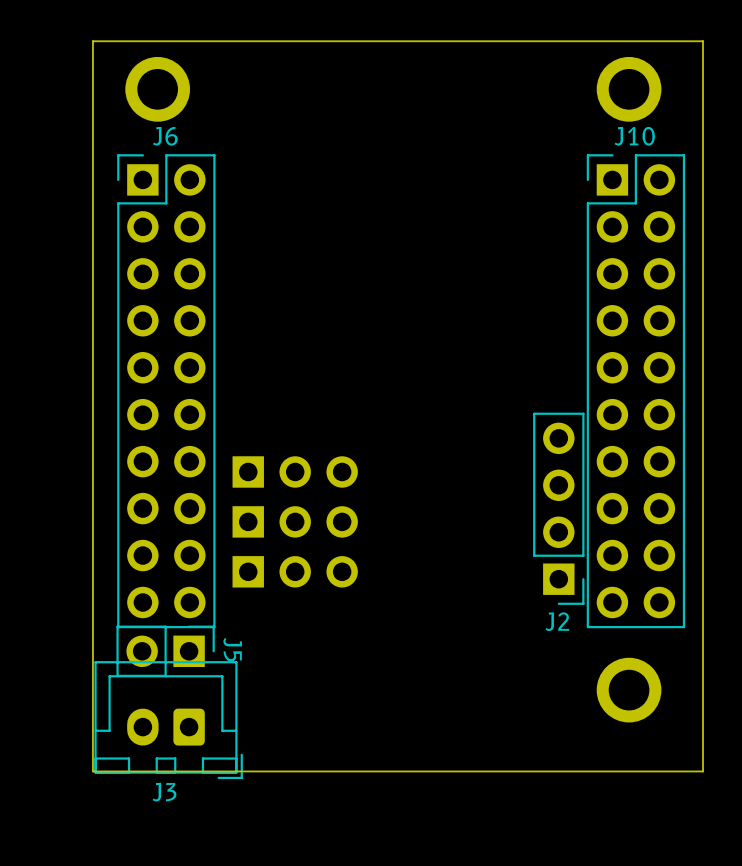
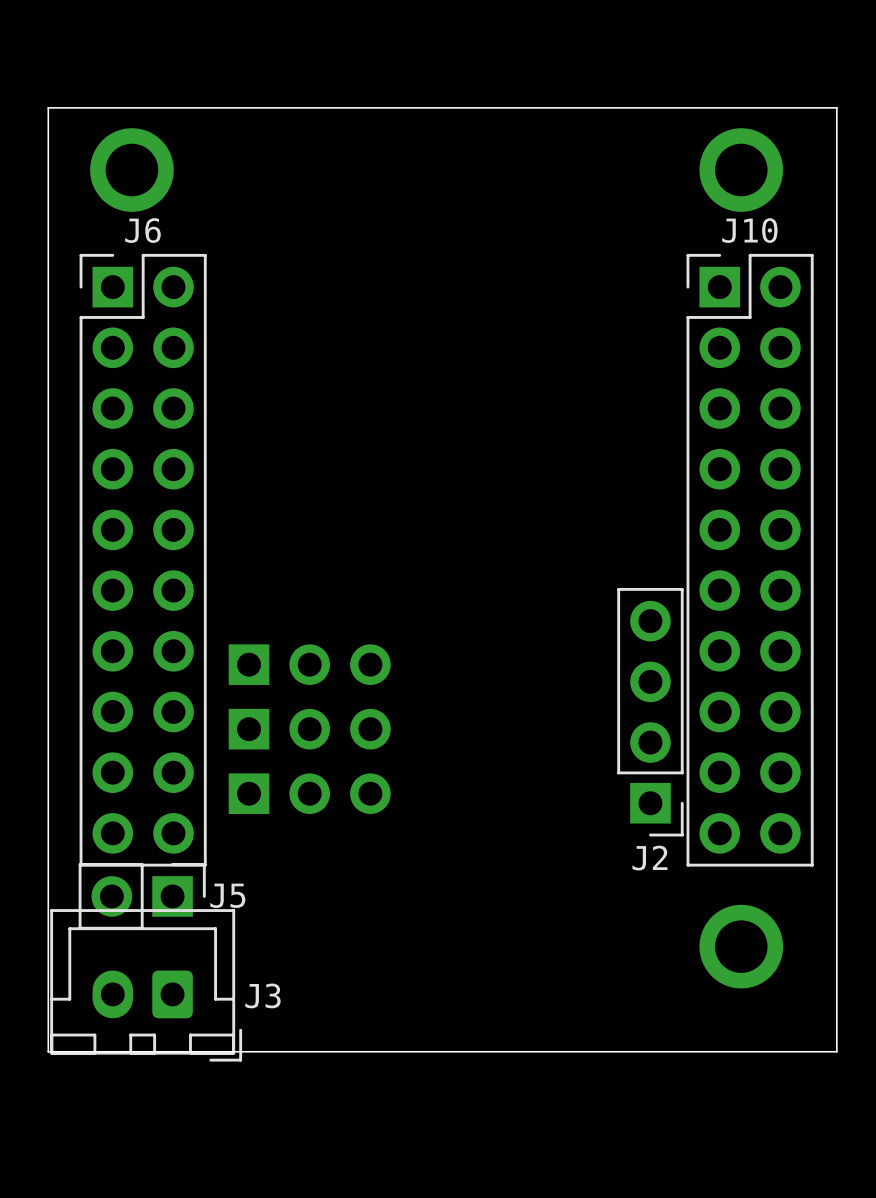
J5 name rotation: 0° (232, 649) -> 90° counterclockwise (227, 895)
J3 name position: J3 (164, 792) -> J3 (262, 995)

